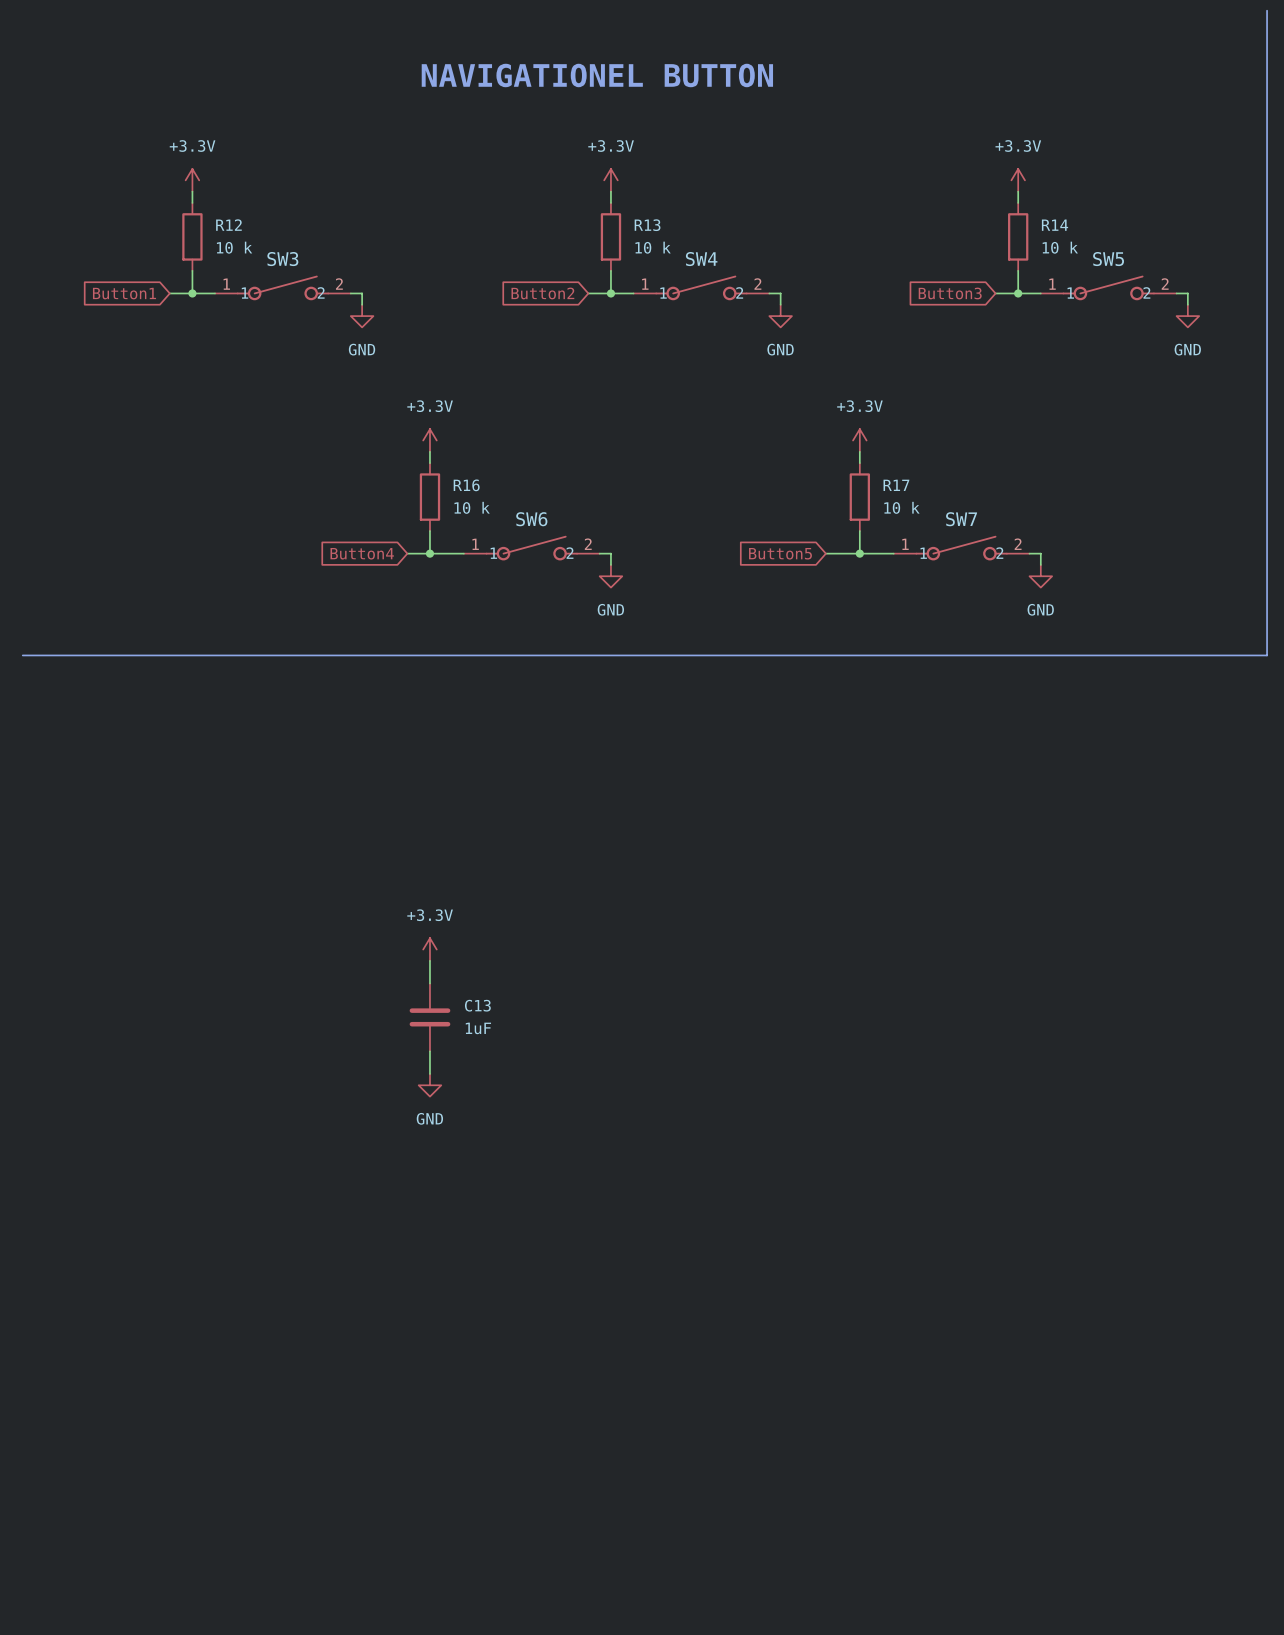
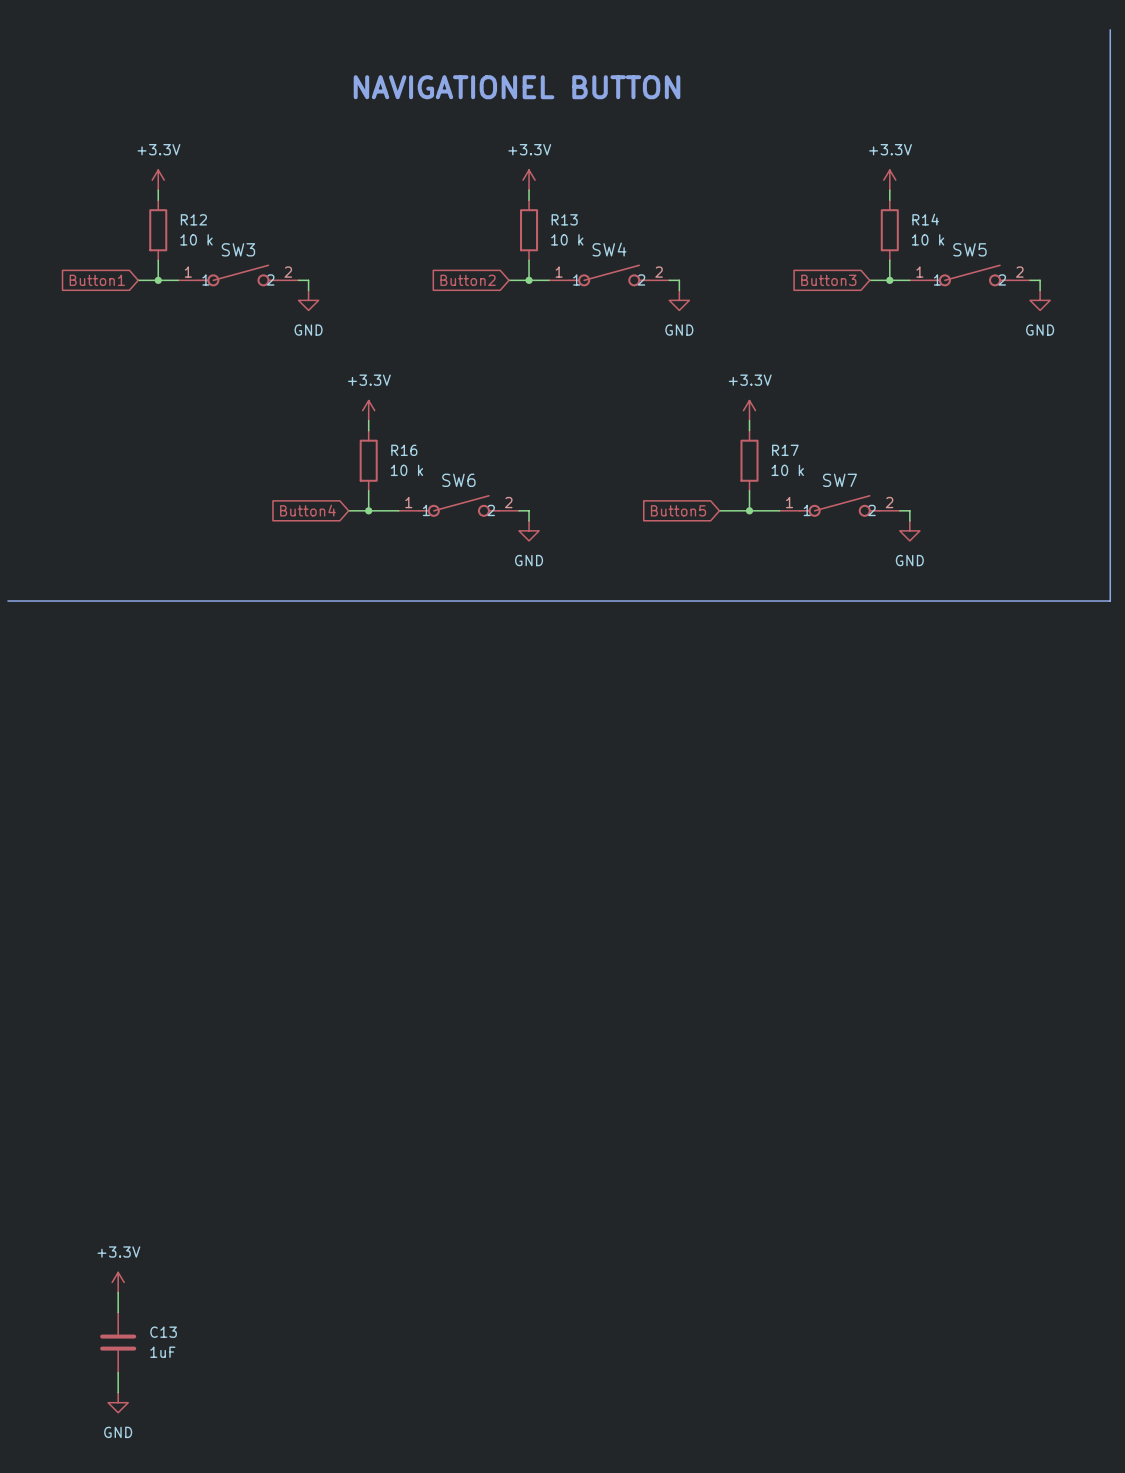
power symbol: +3.3V (429, 949) -> none
wire: (429, 960) (429, 983) -> none
C13 position: (429, 1017) -> (118, 1342)
wire: (429, 1051) (429, 1073) -> none
power symbol: GND (429, 1085) -> none
power symbol: none -> +3.3V (118, 1282)
wire: none -> (118, 1292) (118, 1312)
wire: none -> (118, 1372) (118, 1392)
power symbol: none -> GND (118, 1402)

